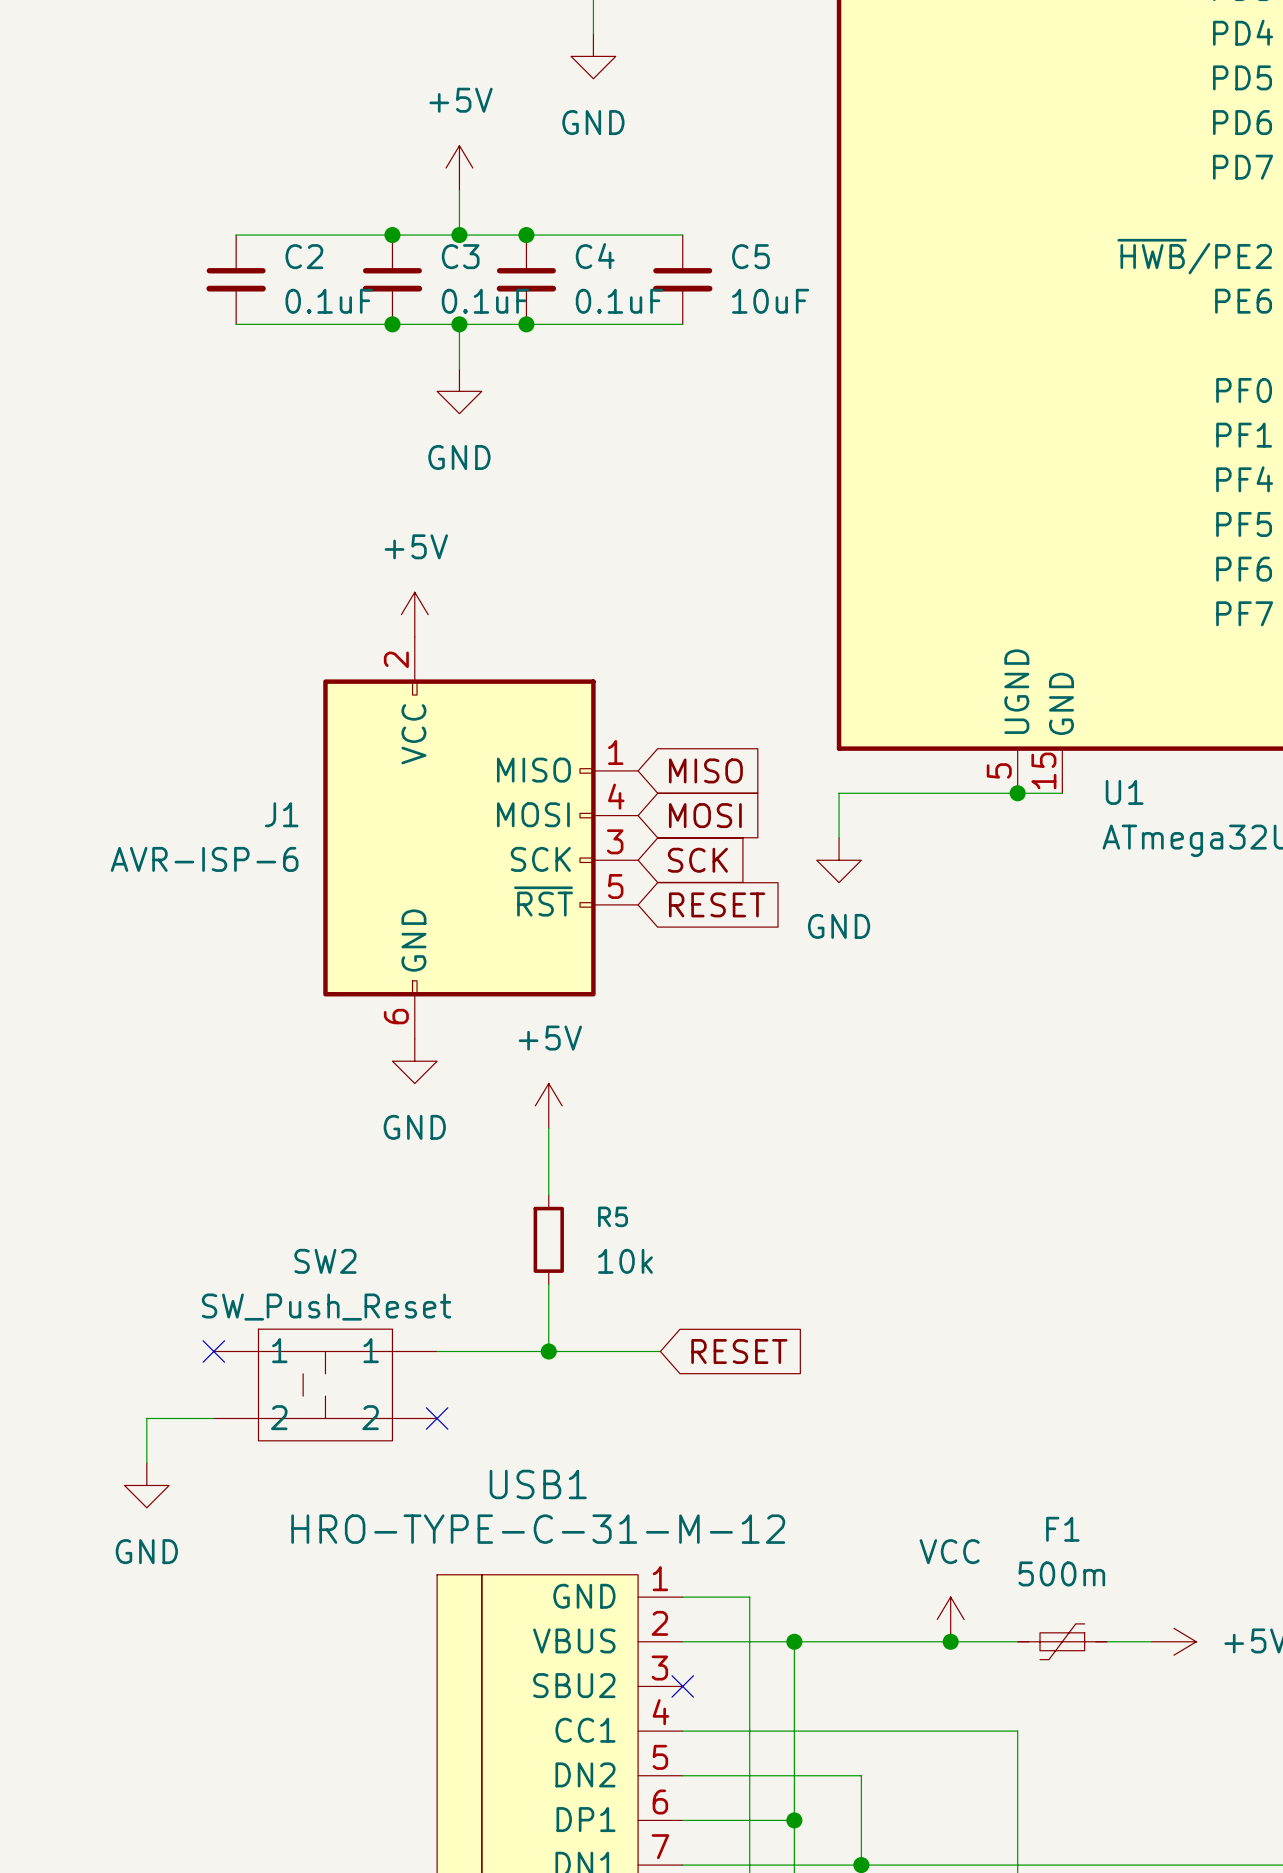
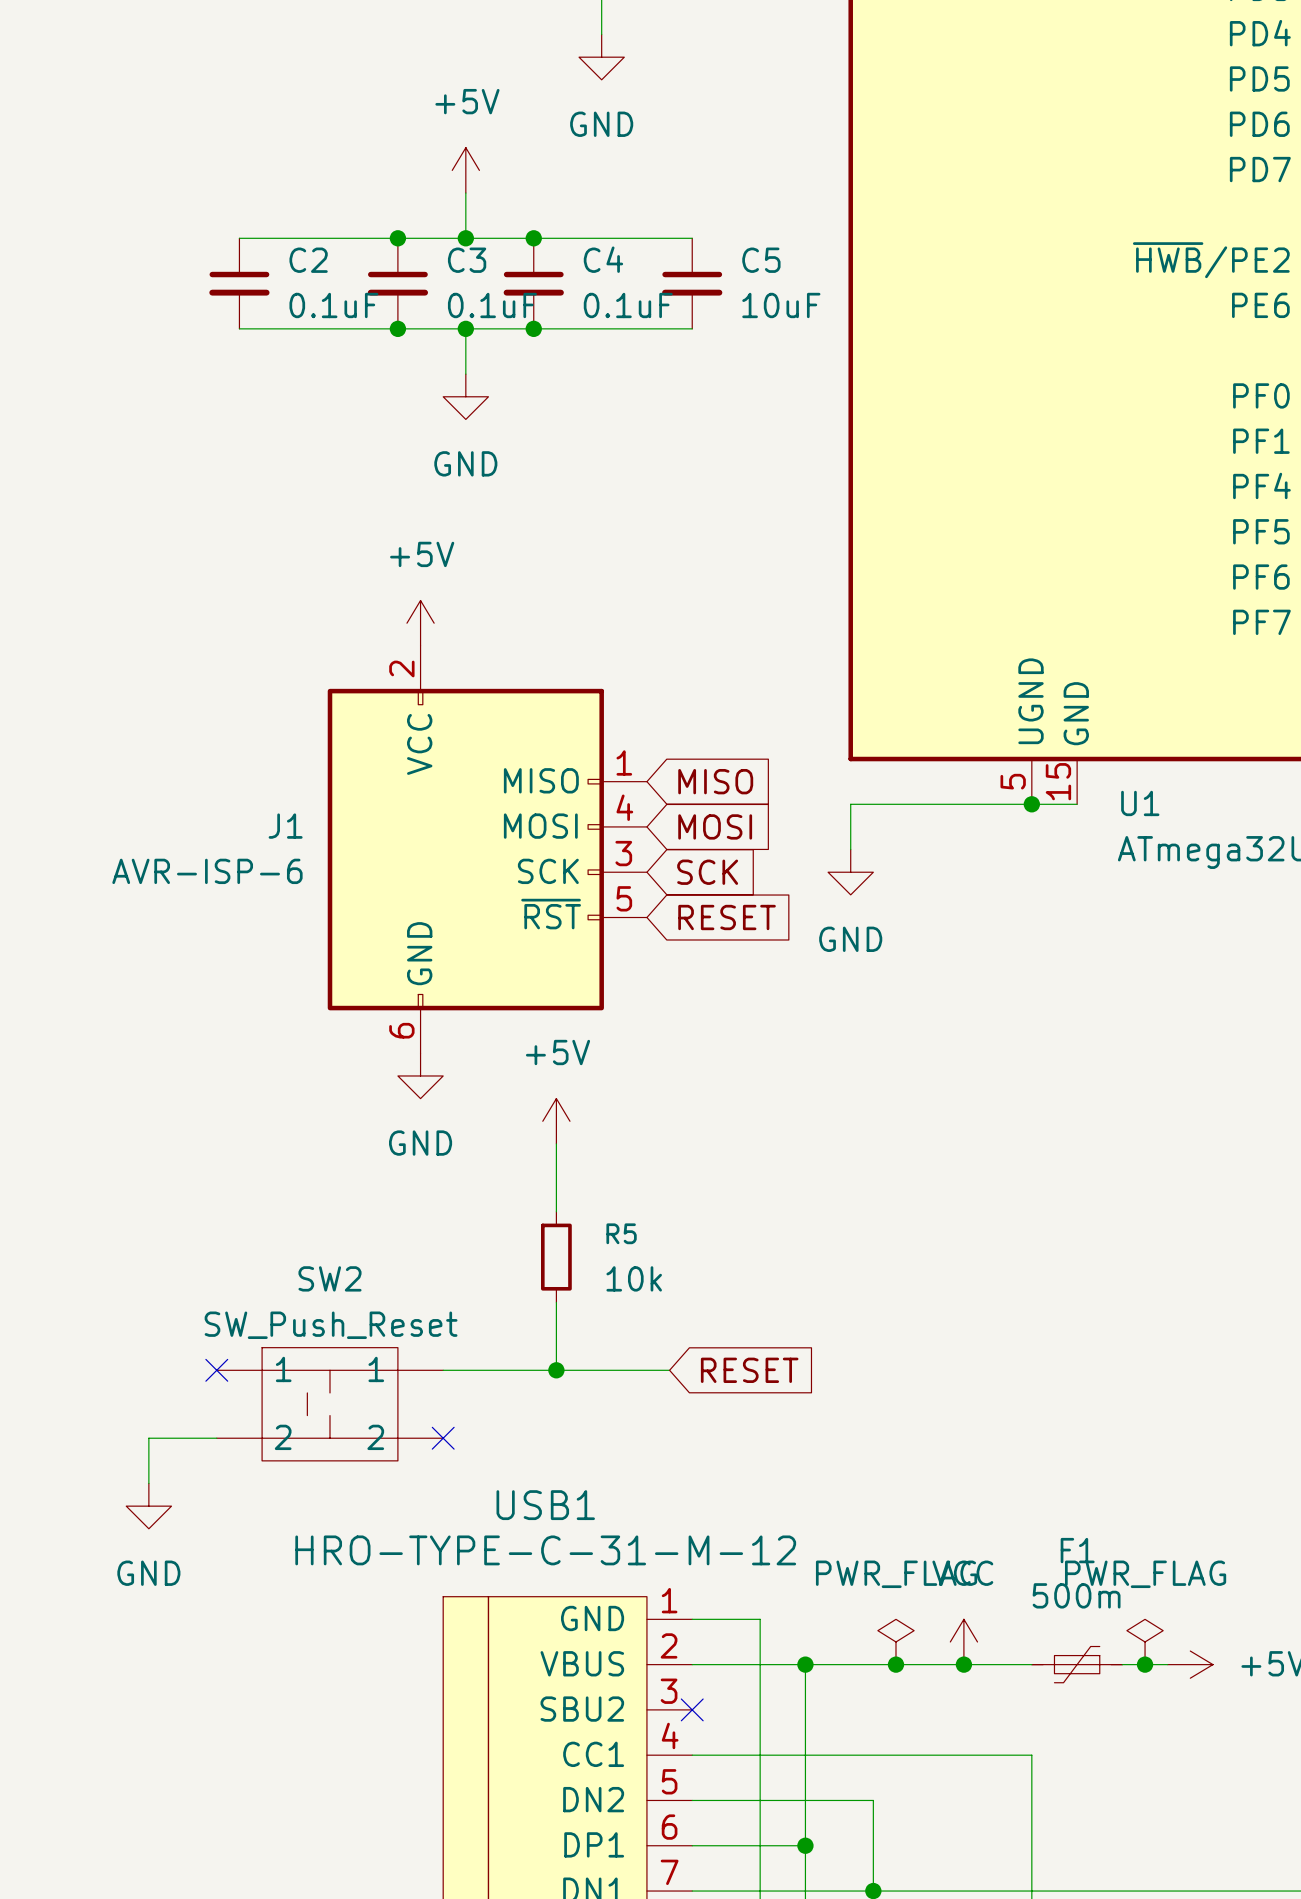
power symbol: none -> PWR_FLAG (895, 1641)
power symbol: none -> PWR_FLAG (1145, 1641)
junction: none -> (895, 1664)
junction: none -> (1145, 1664)

